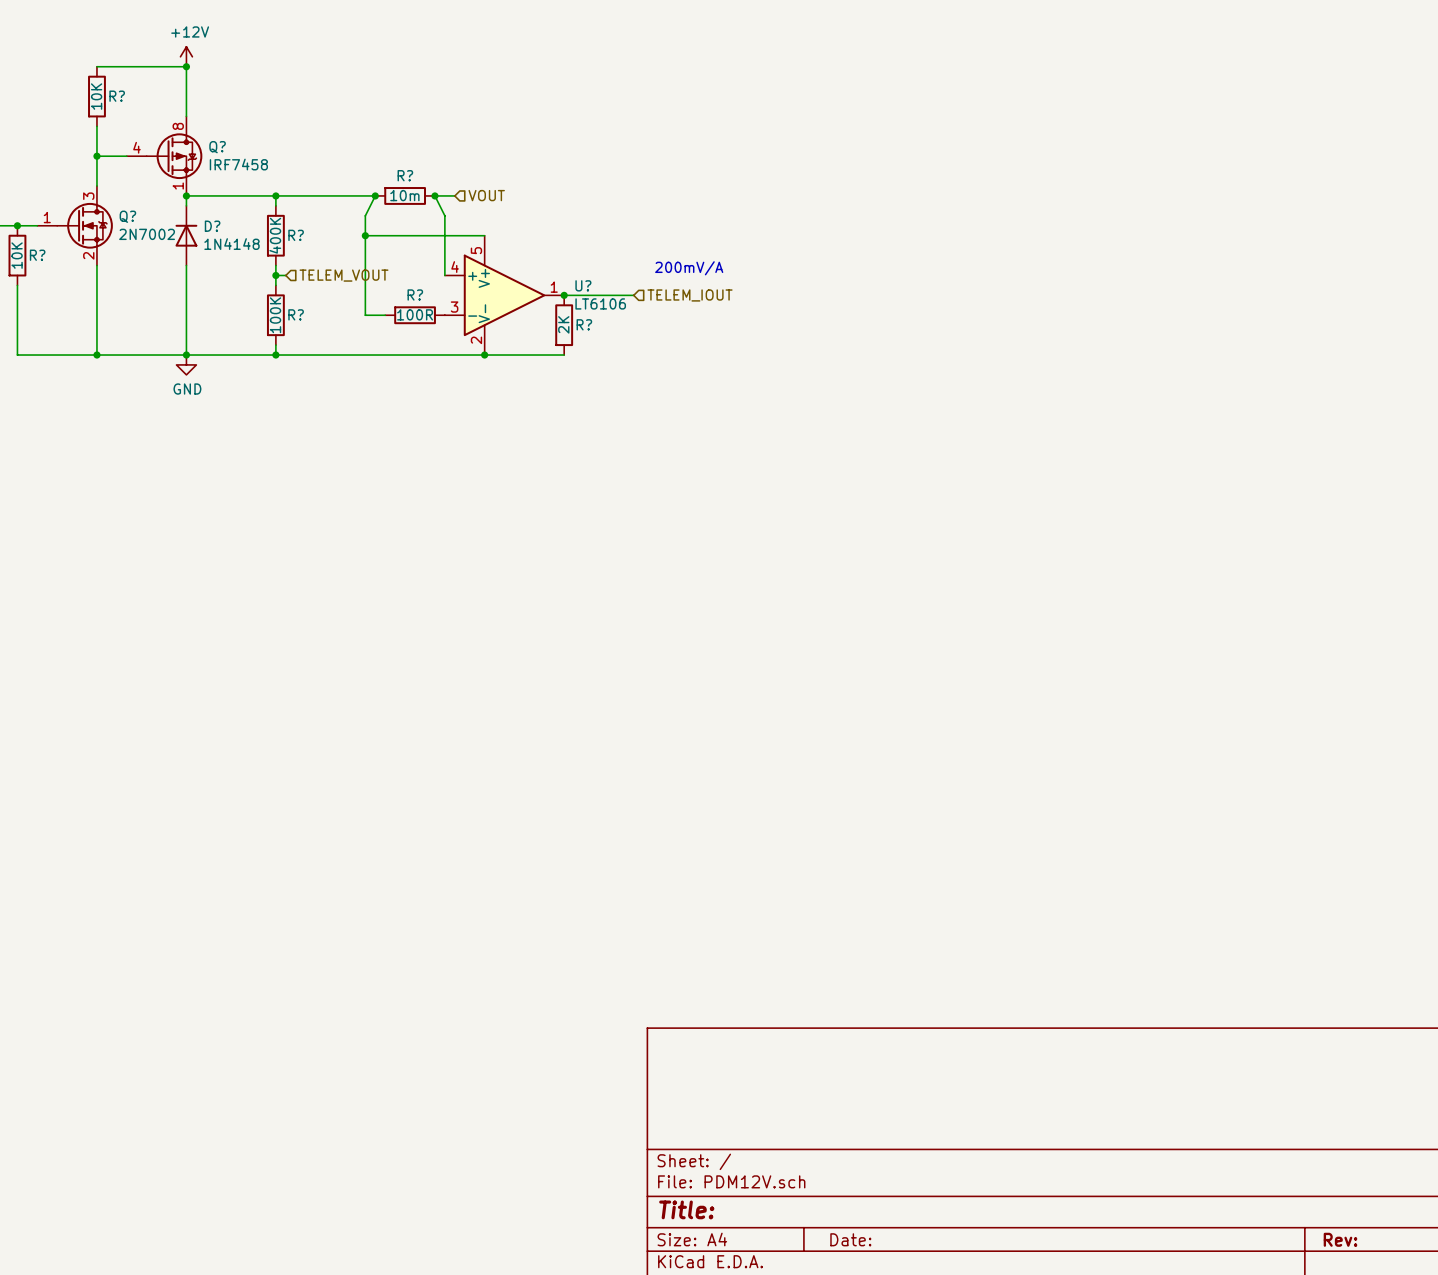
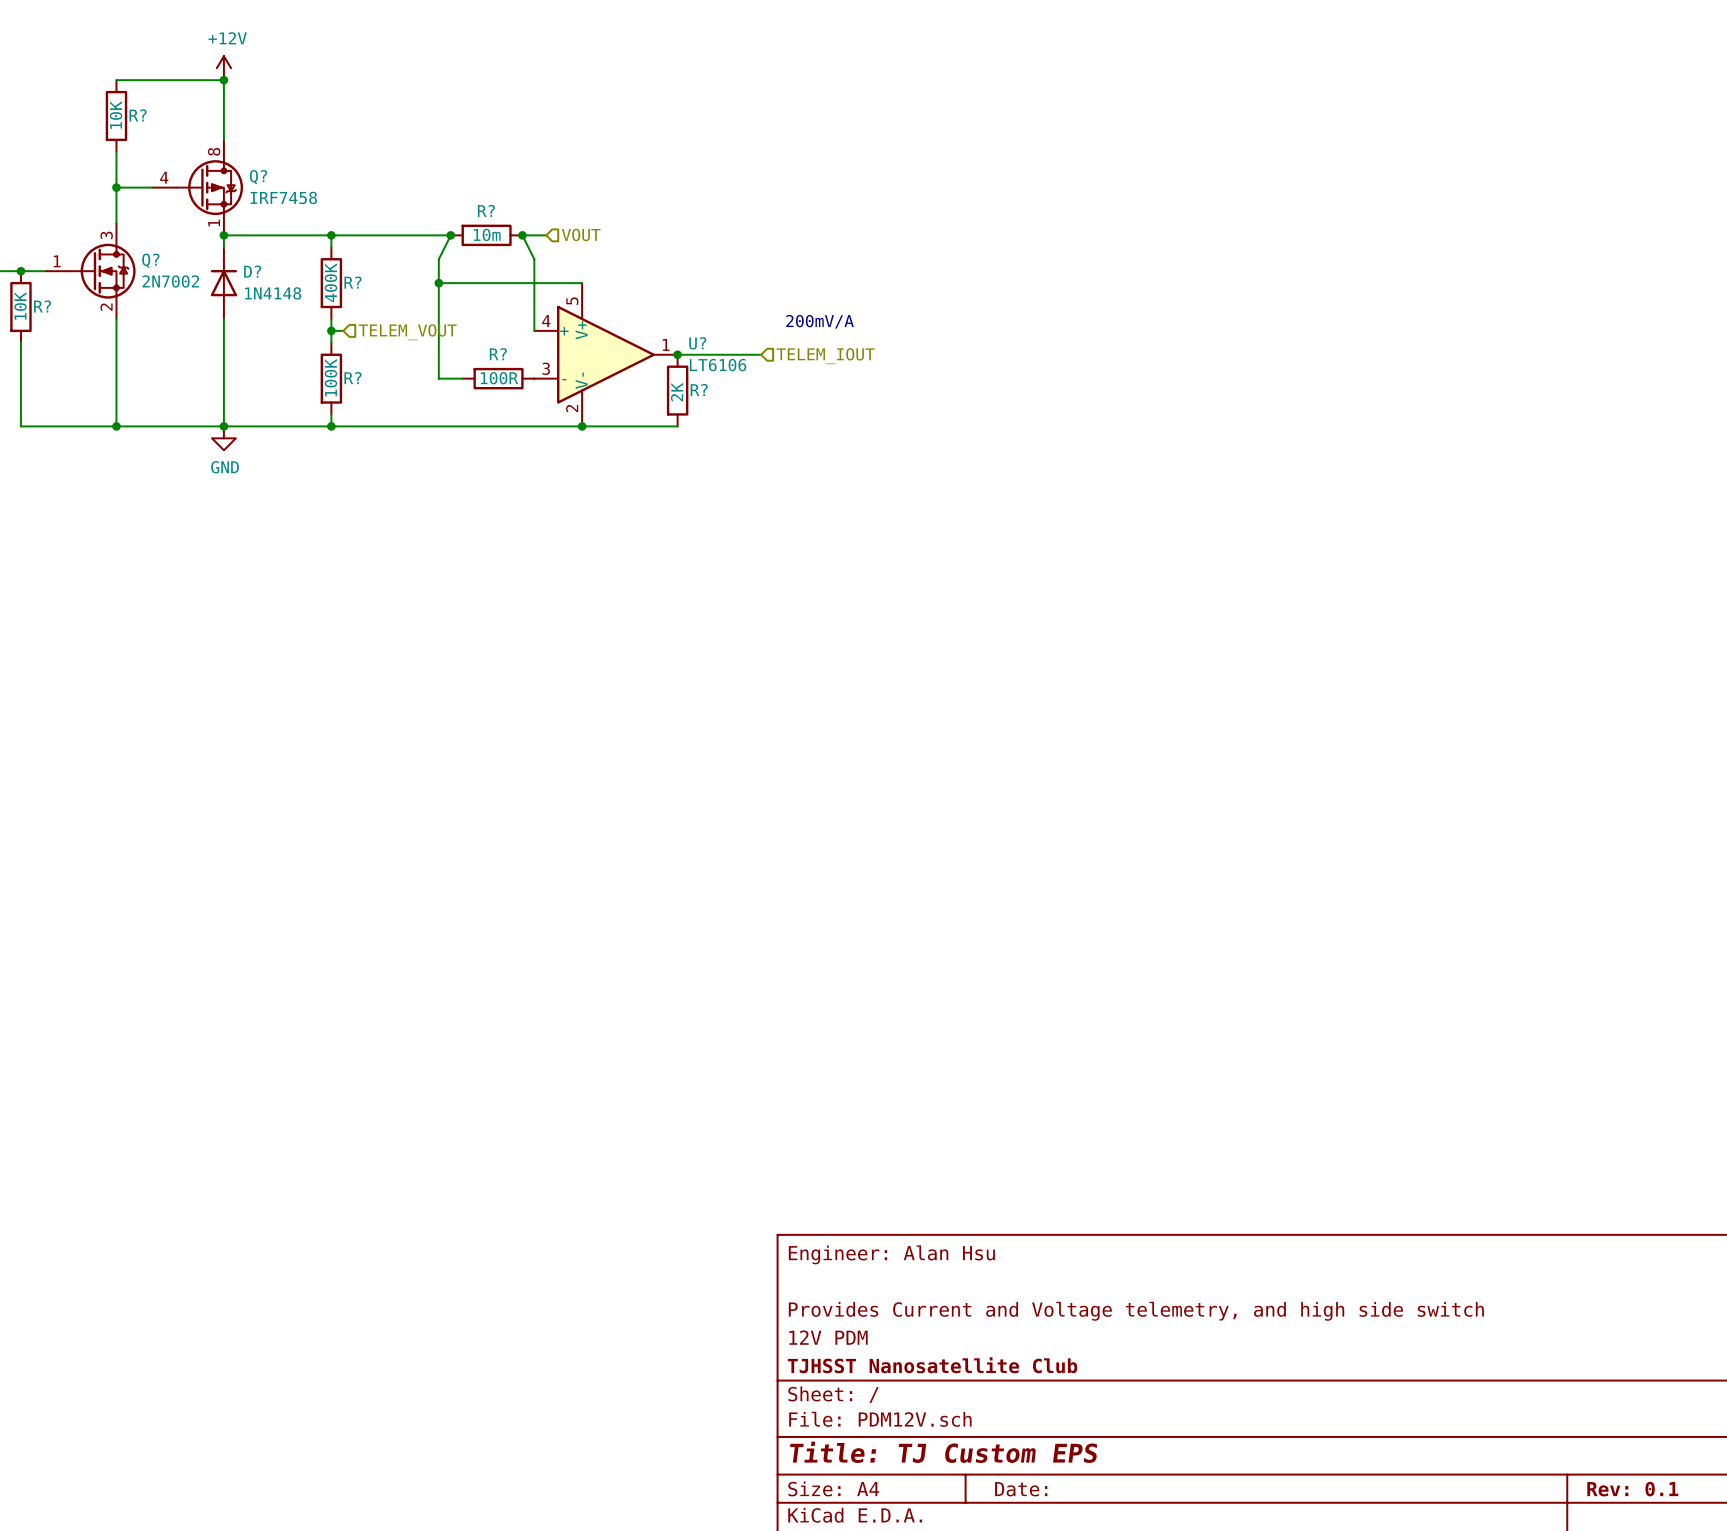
title block: none -> Engineer: Alan Hsu (891, 1254)
title block: none -> Provides Current and Voltage telemetry, and high side switch (1136, 1311)
title block: none -> 12V PDM (828, 1337)
title block: none -> TJHSST Nanosatellite Club (932, 1365)
title block: Title: (686, 1209) -> Title: TJ Custom EPS (943, 1452)
title block: Rev: (1340, 1239) -> Rev: 0.1 (1632, 1489)

